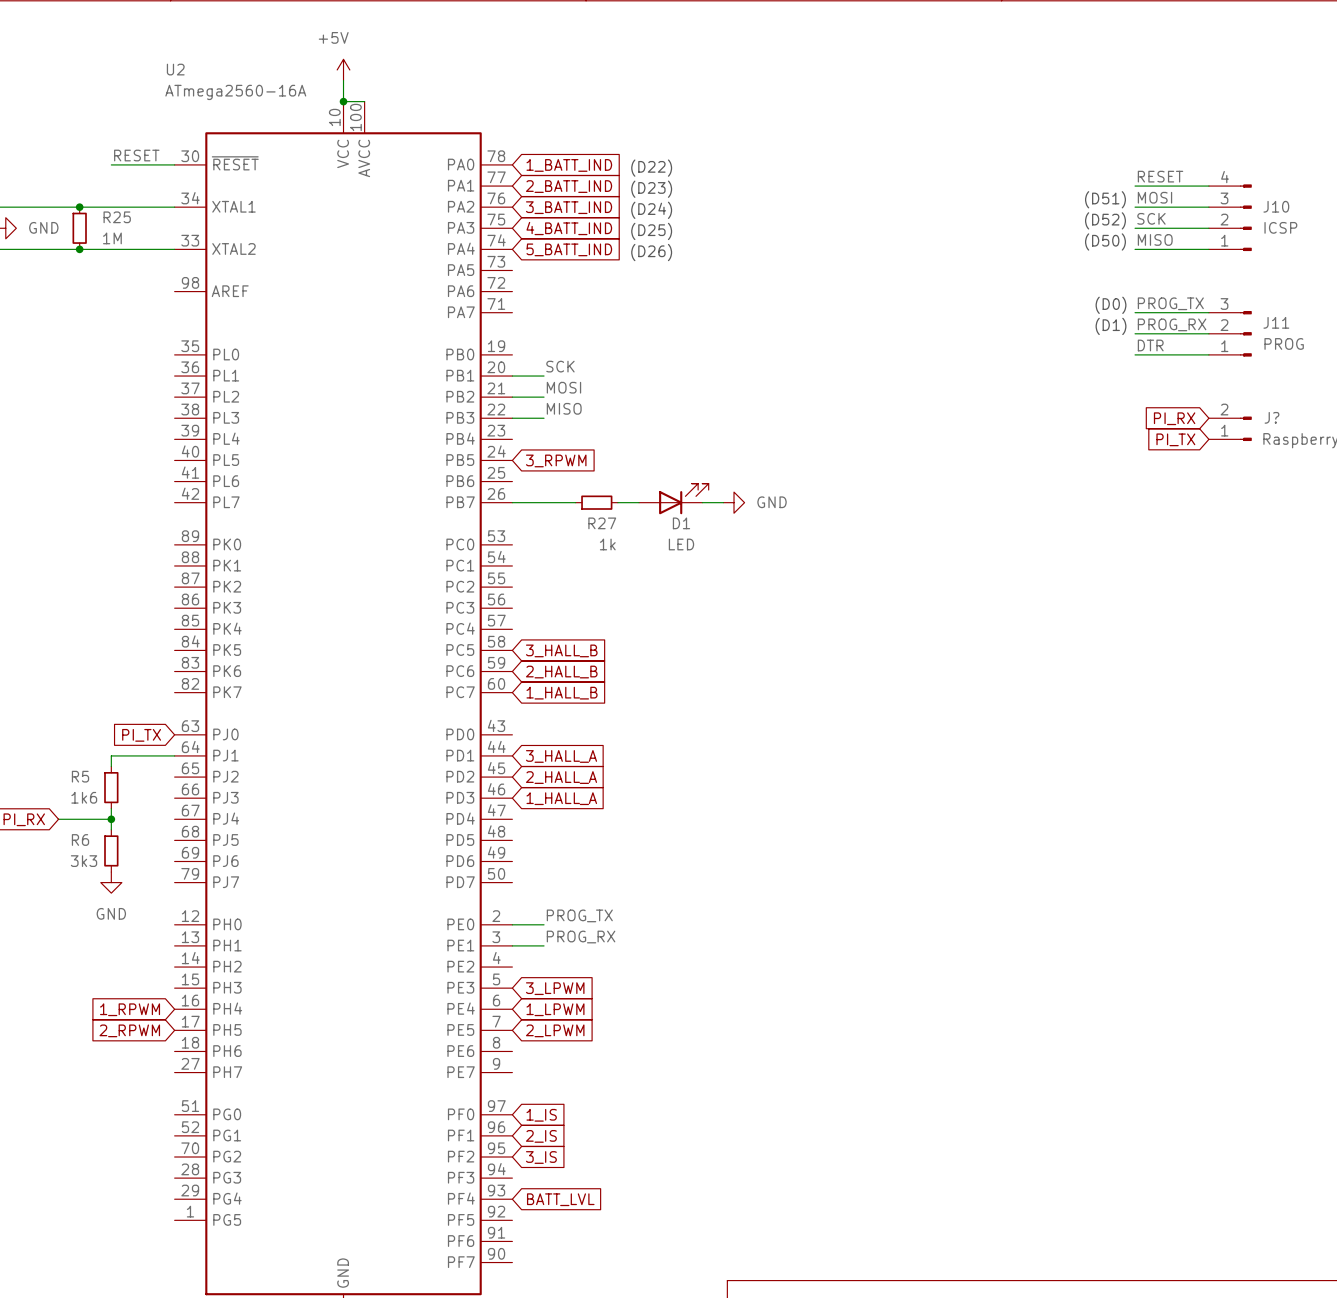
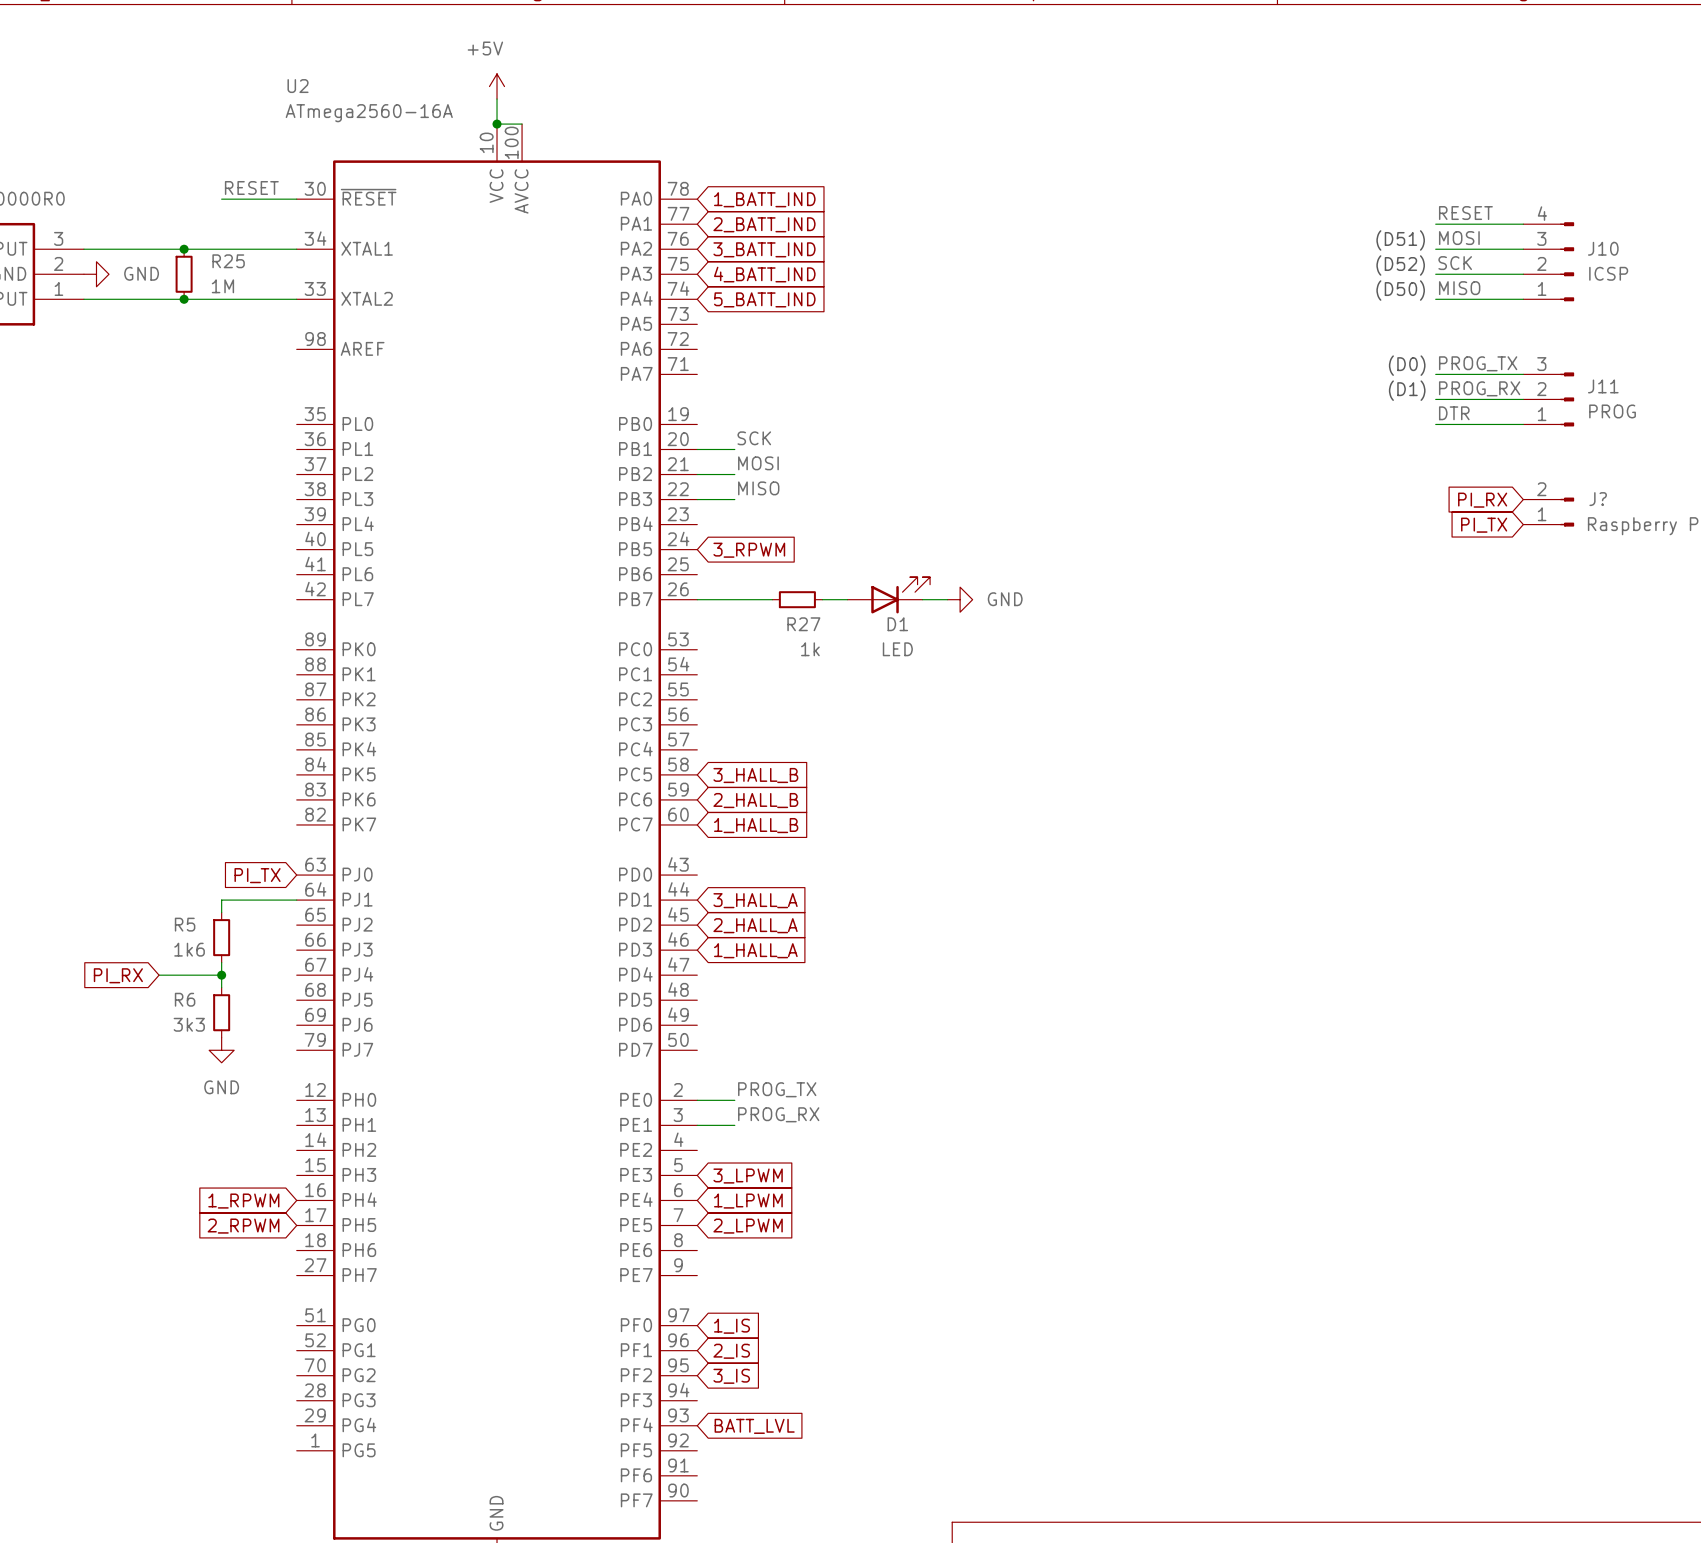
text: (D22) (651, 168) -> none
text: (D23) (651, 189) -> none
text: (D24) (651, 210) -> none
text: (D25) (651, 231) -> none
text: (D26) (651, 252) -> none

